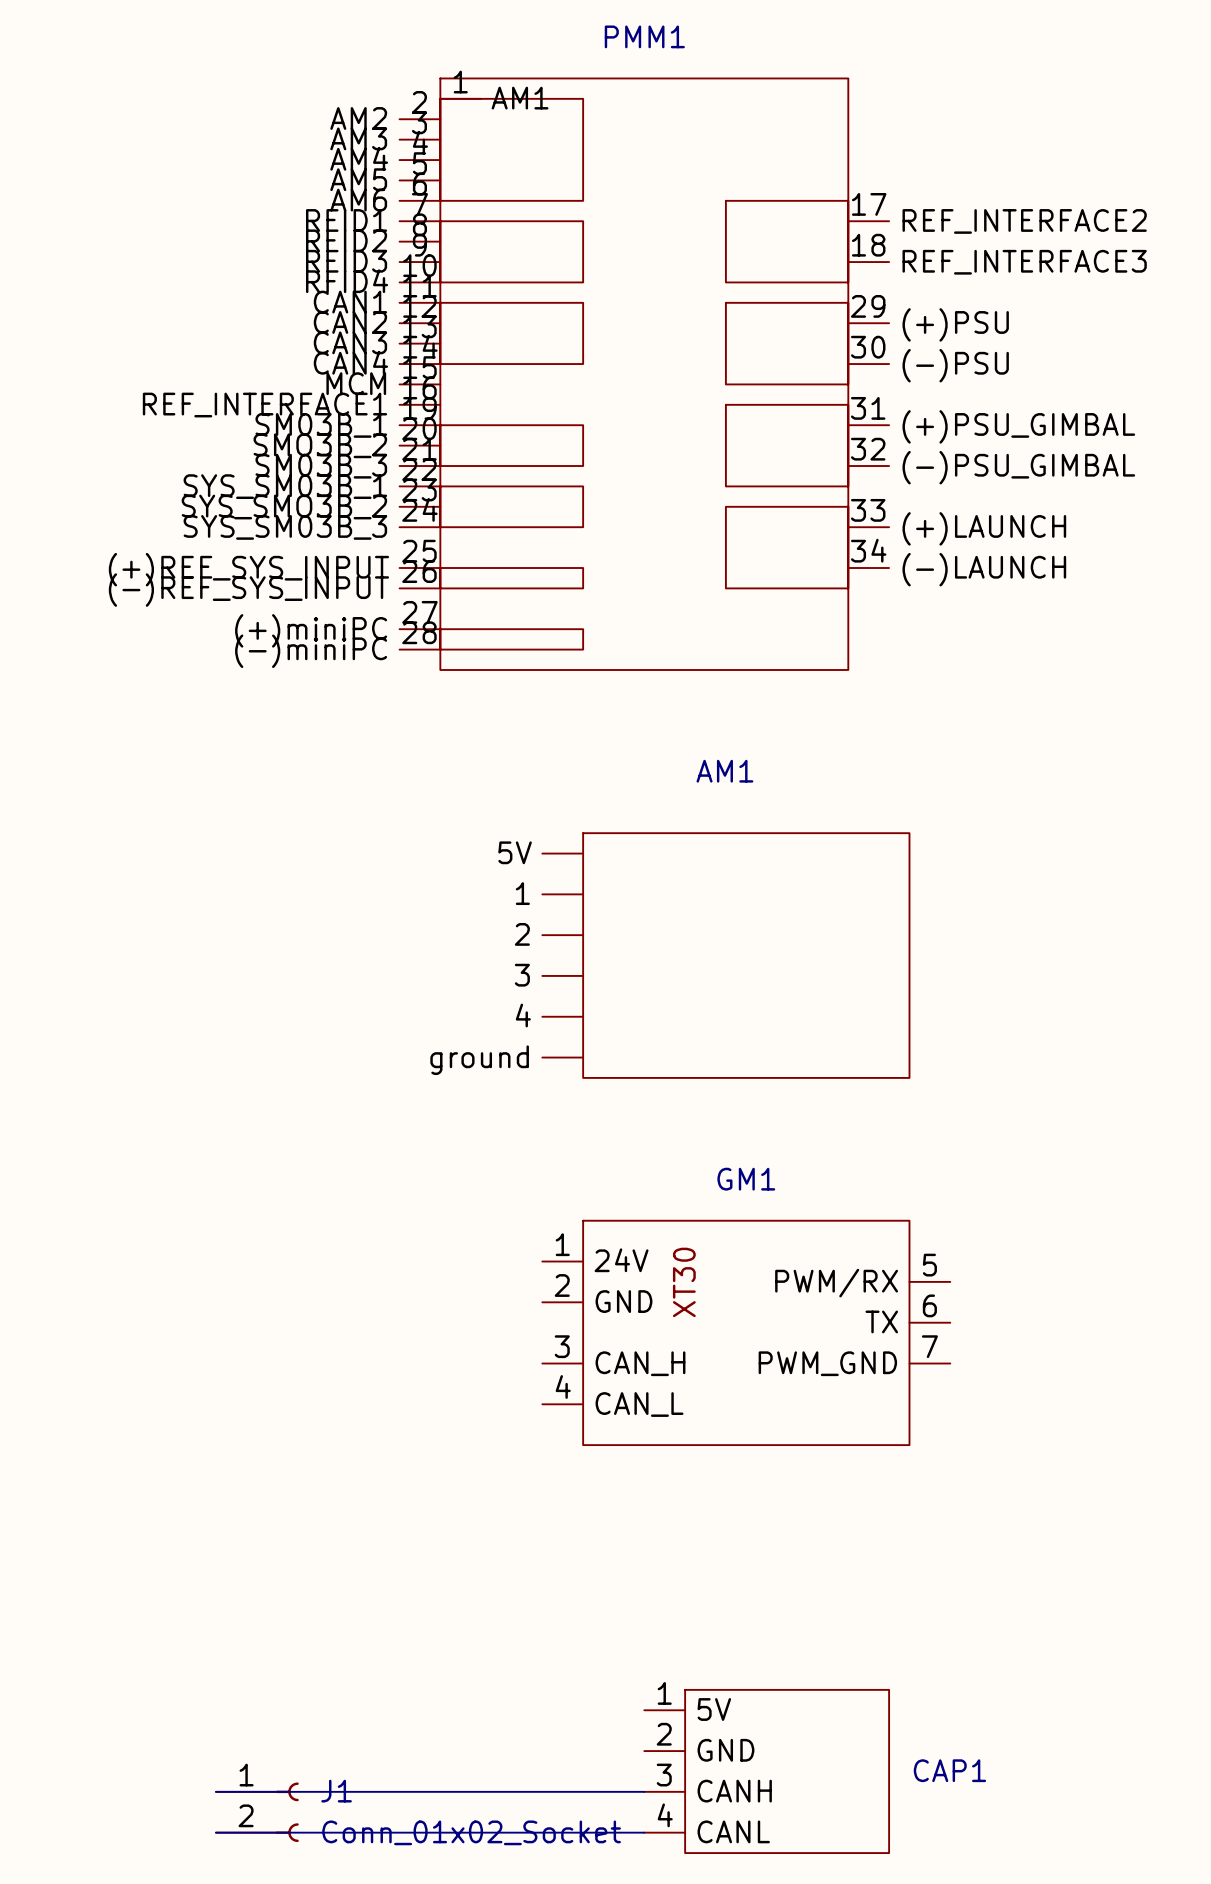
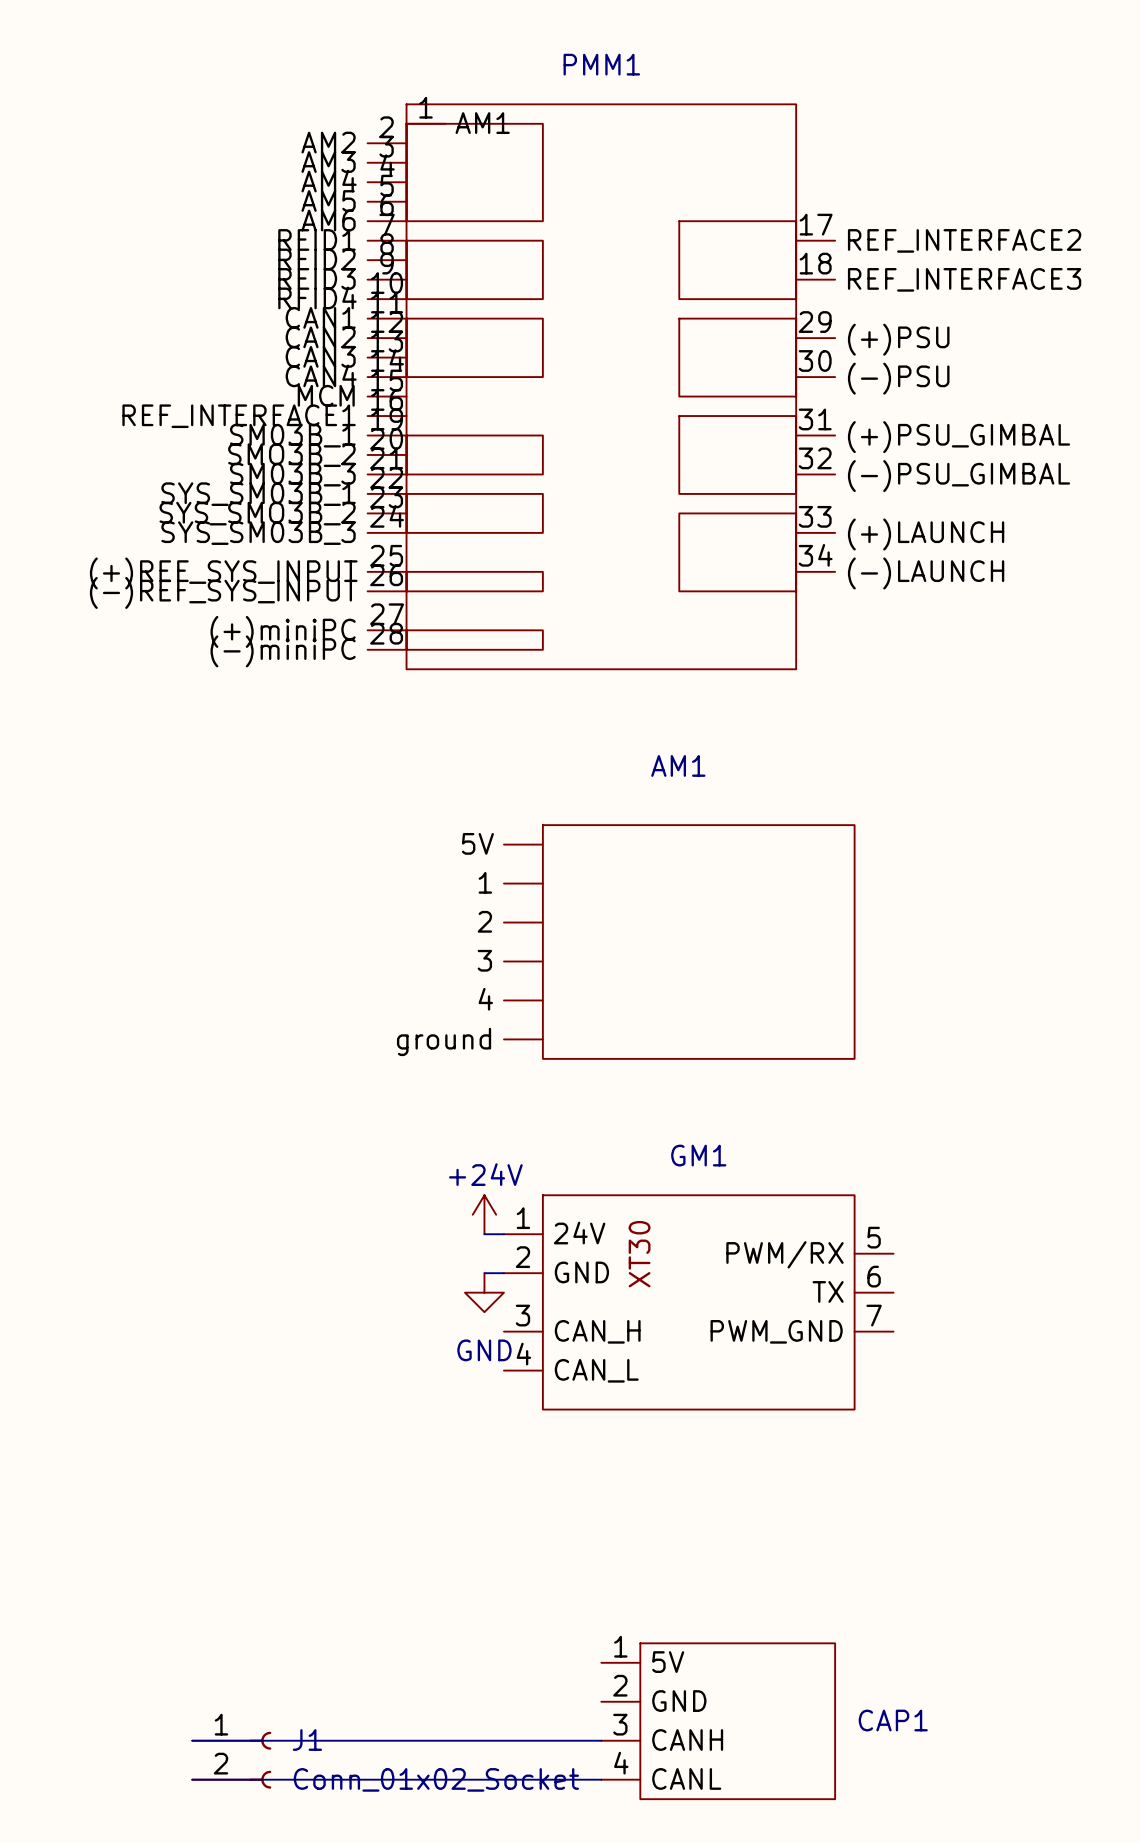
power symbol: none -> +24V (484, 1214)
wire: none -> (484, 1234) (503, 1234)
wire: none -> (484, 1273) (503, 1273)
power symbol: none -> GND (484, 1292)

